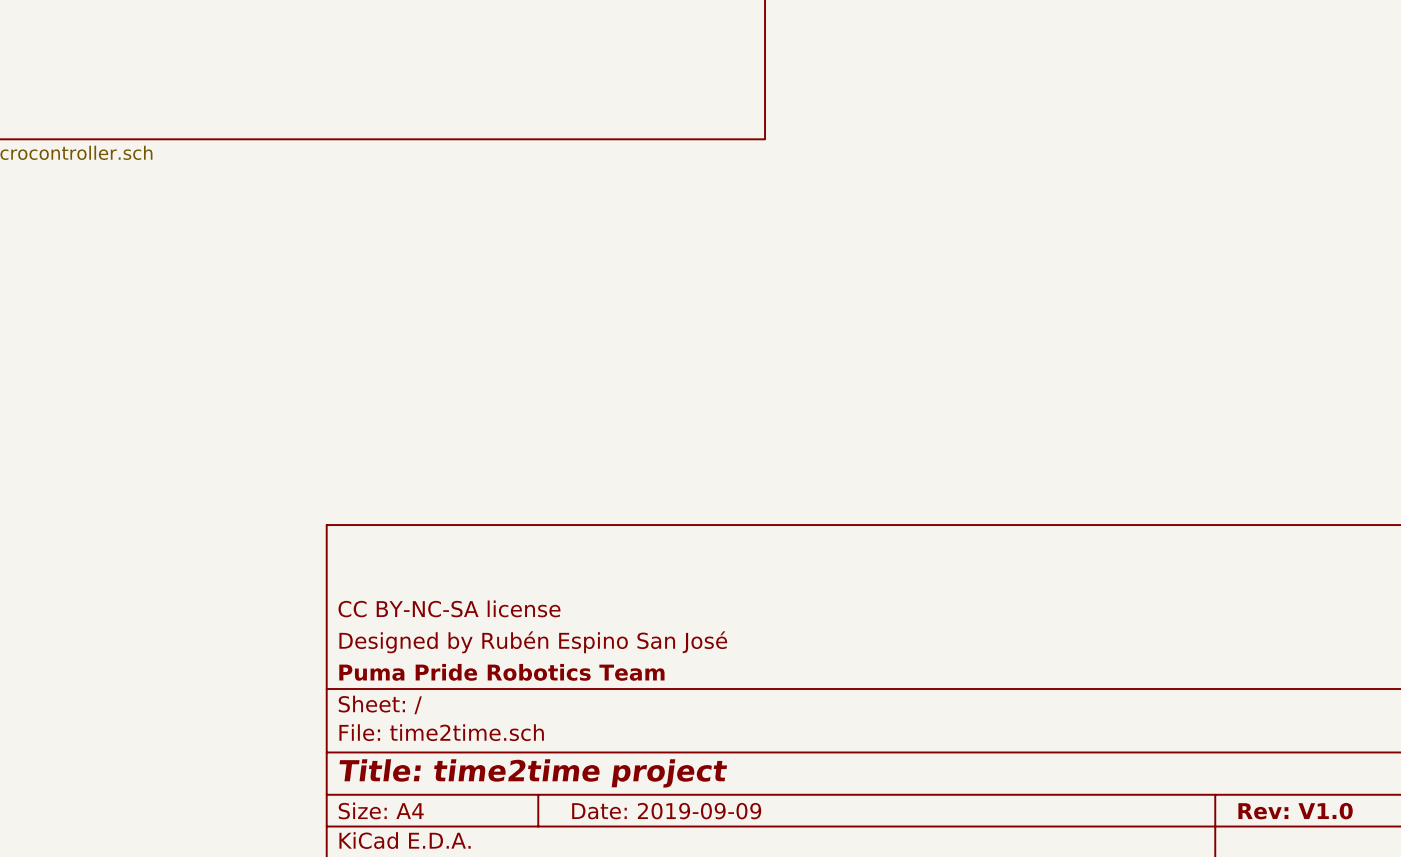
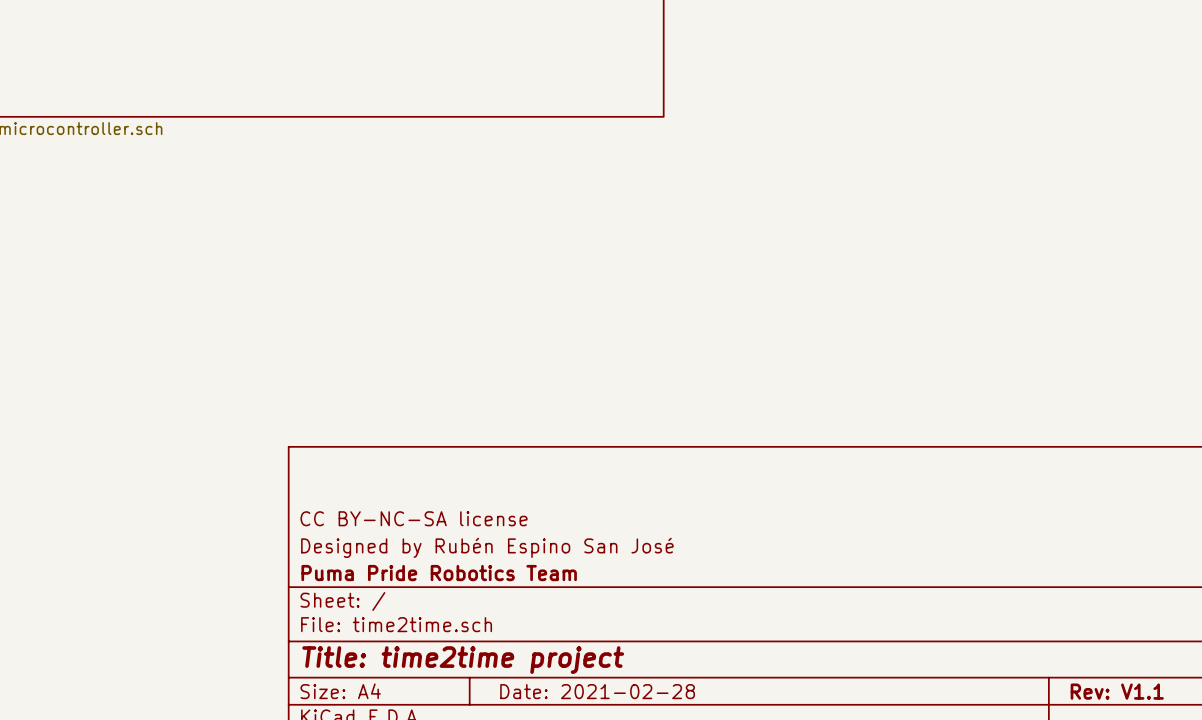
title block: Date: 2019-09-09 (666, 811) -> Date: 2021-02-28 (597, 691)
title block: Rev: V1.0 (1295, 811) -> Rev: V1.1 (1117, 691)

